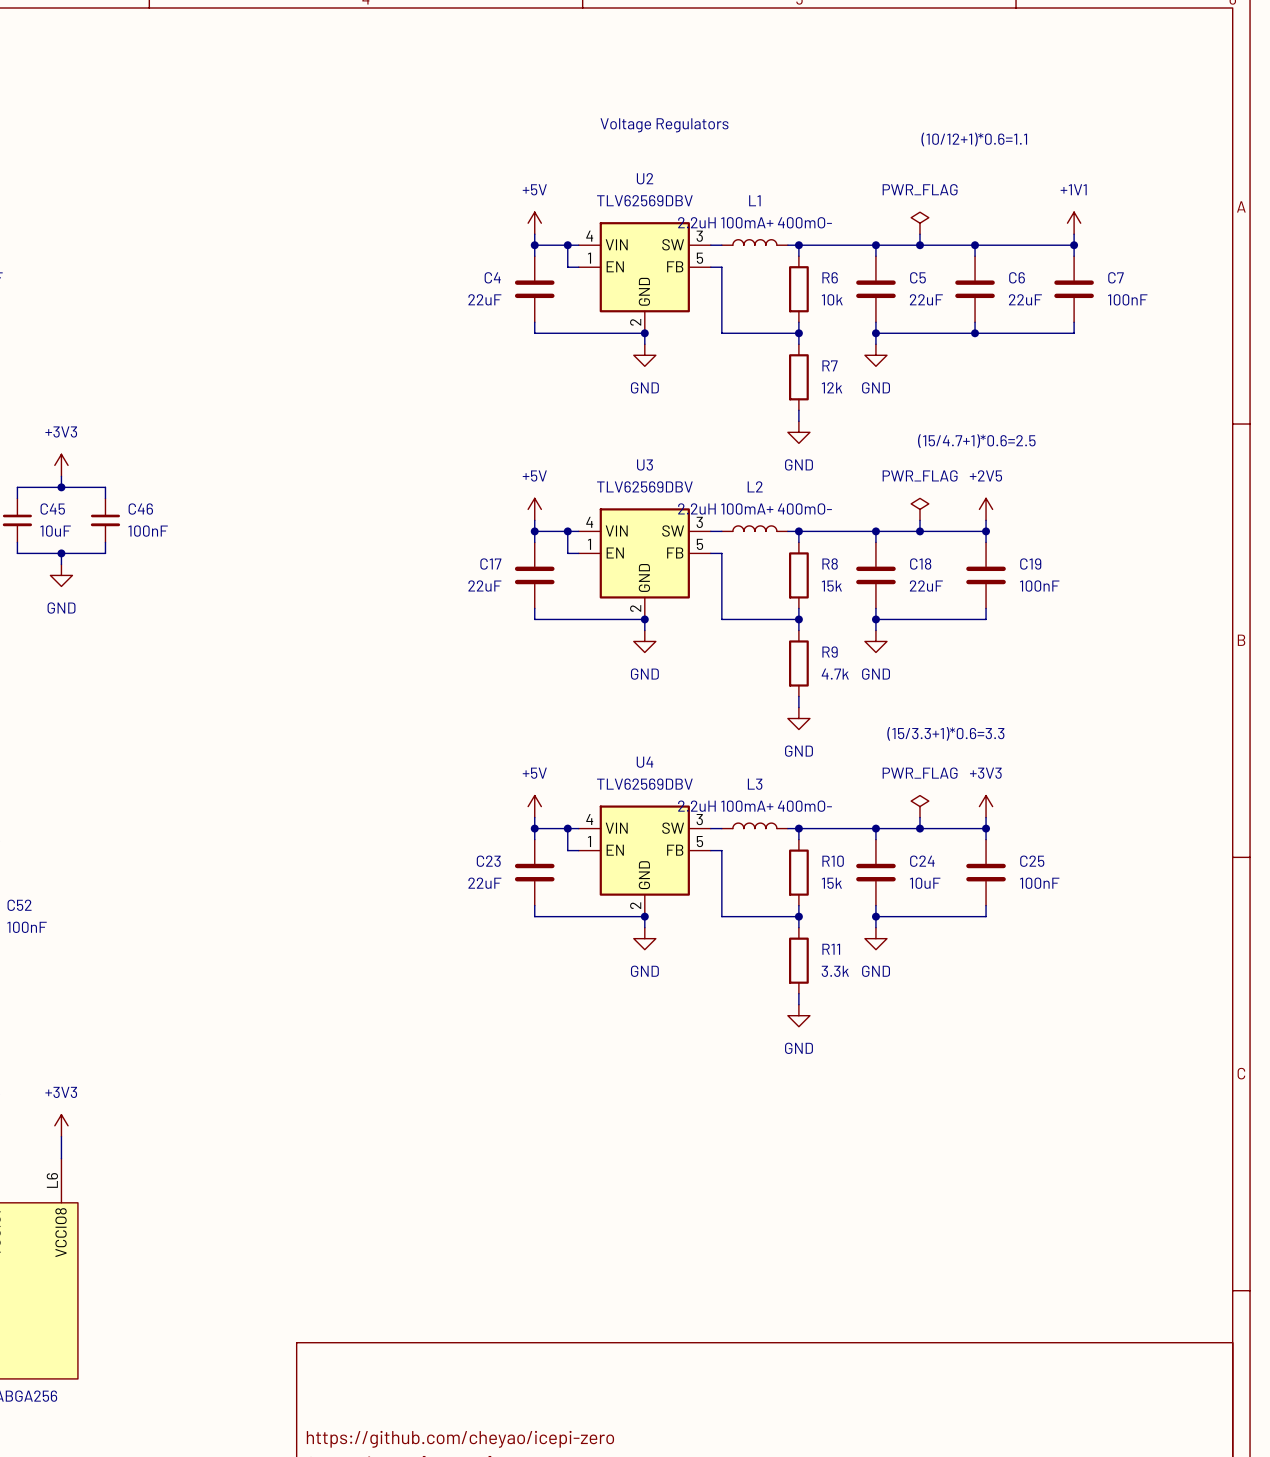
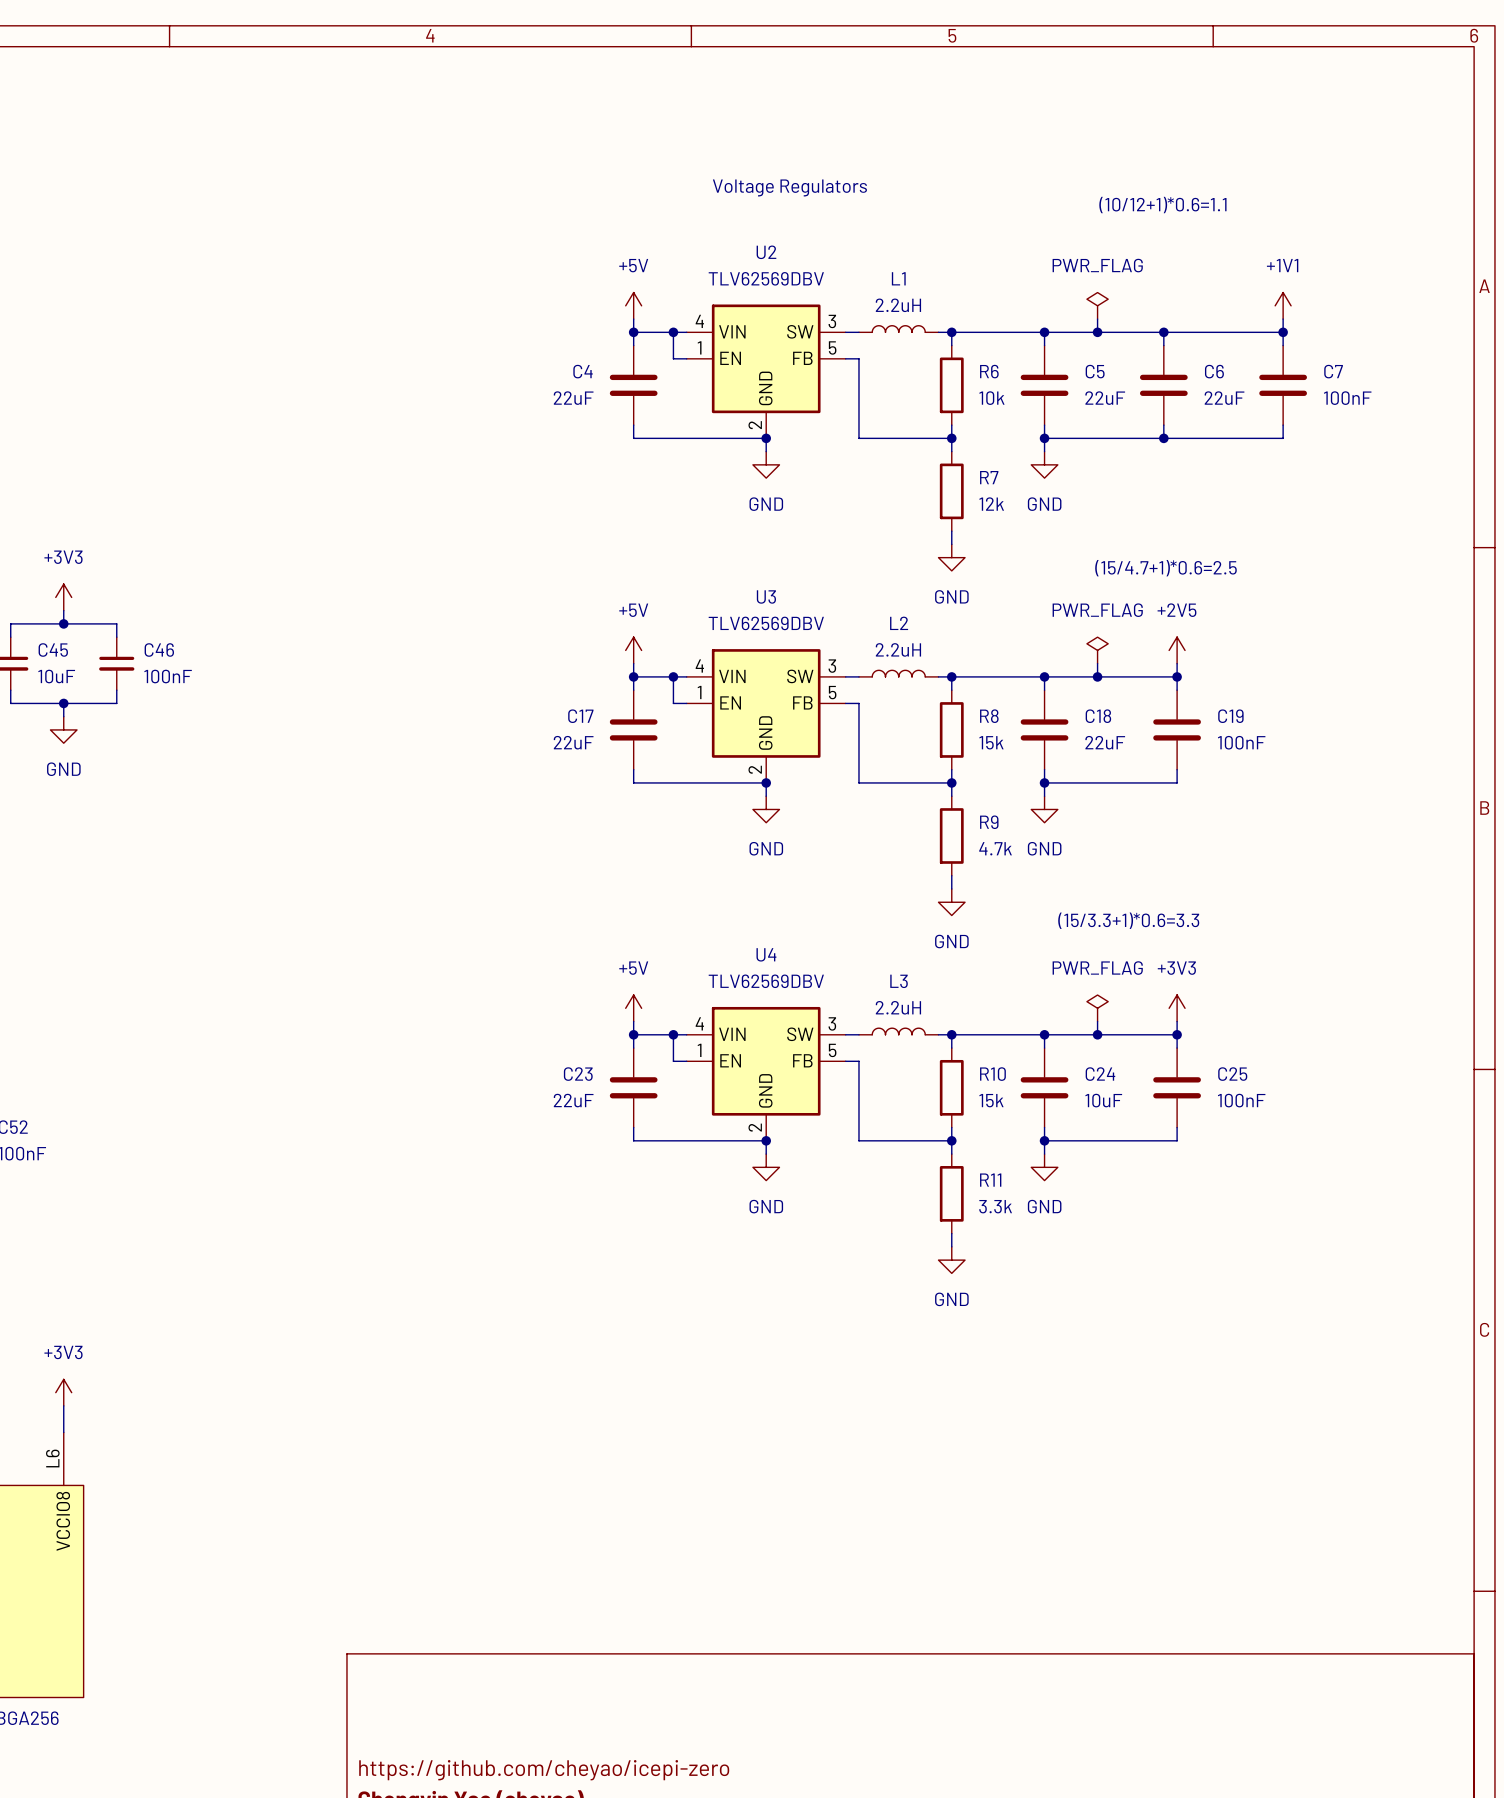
L1 value: 2.2uH 100mA+ 400mO- (755, 222) -> 2.2uH (898, 305)
L2 value: 2.2uH 100mA+ 400mO- (755, 508) -> 2.2uH (898, 649)
L3 value: 2.2uH 100mA+ 400mO- (755, 806) -> 2.2uH (898, 1007)

